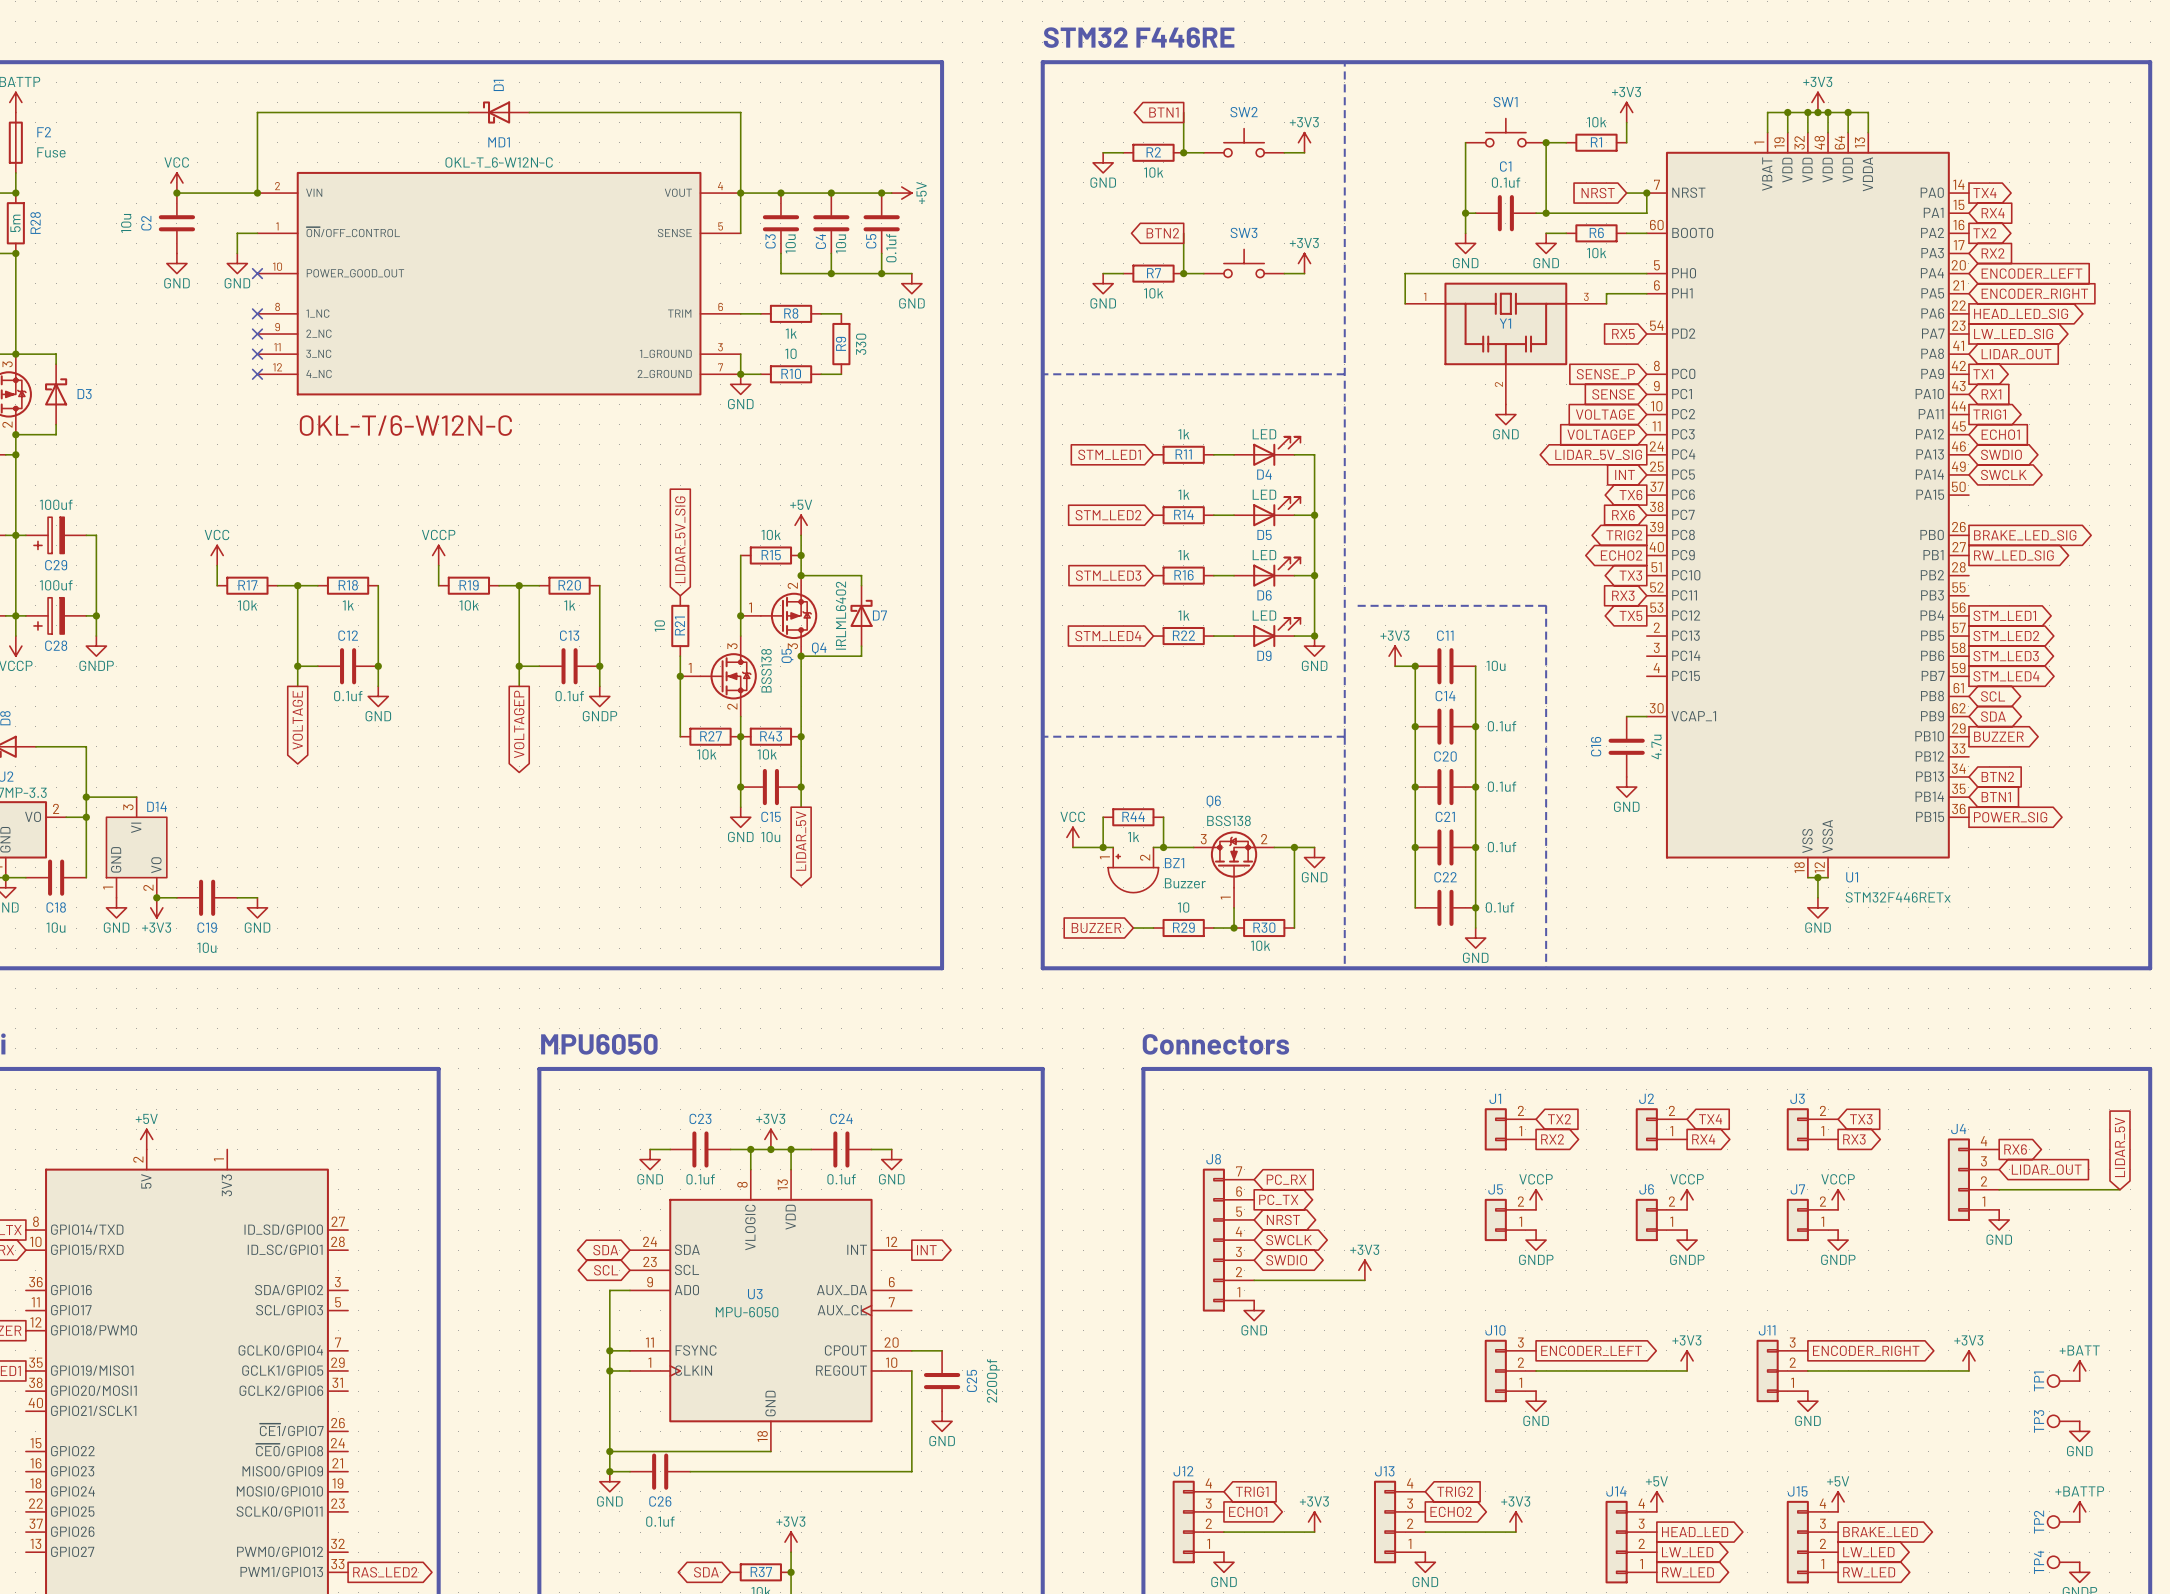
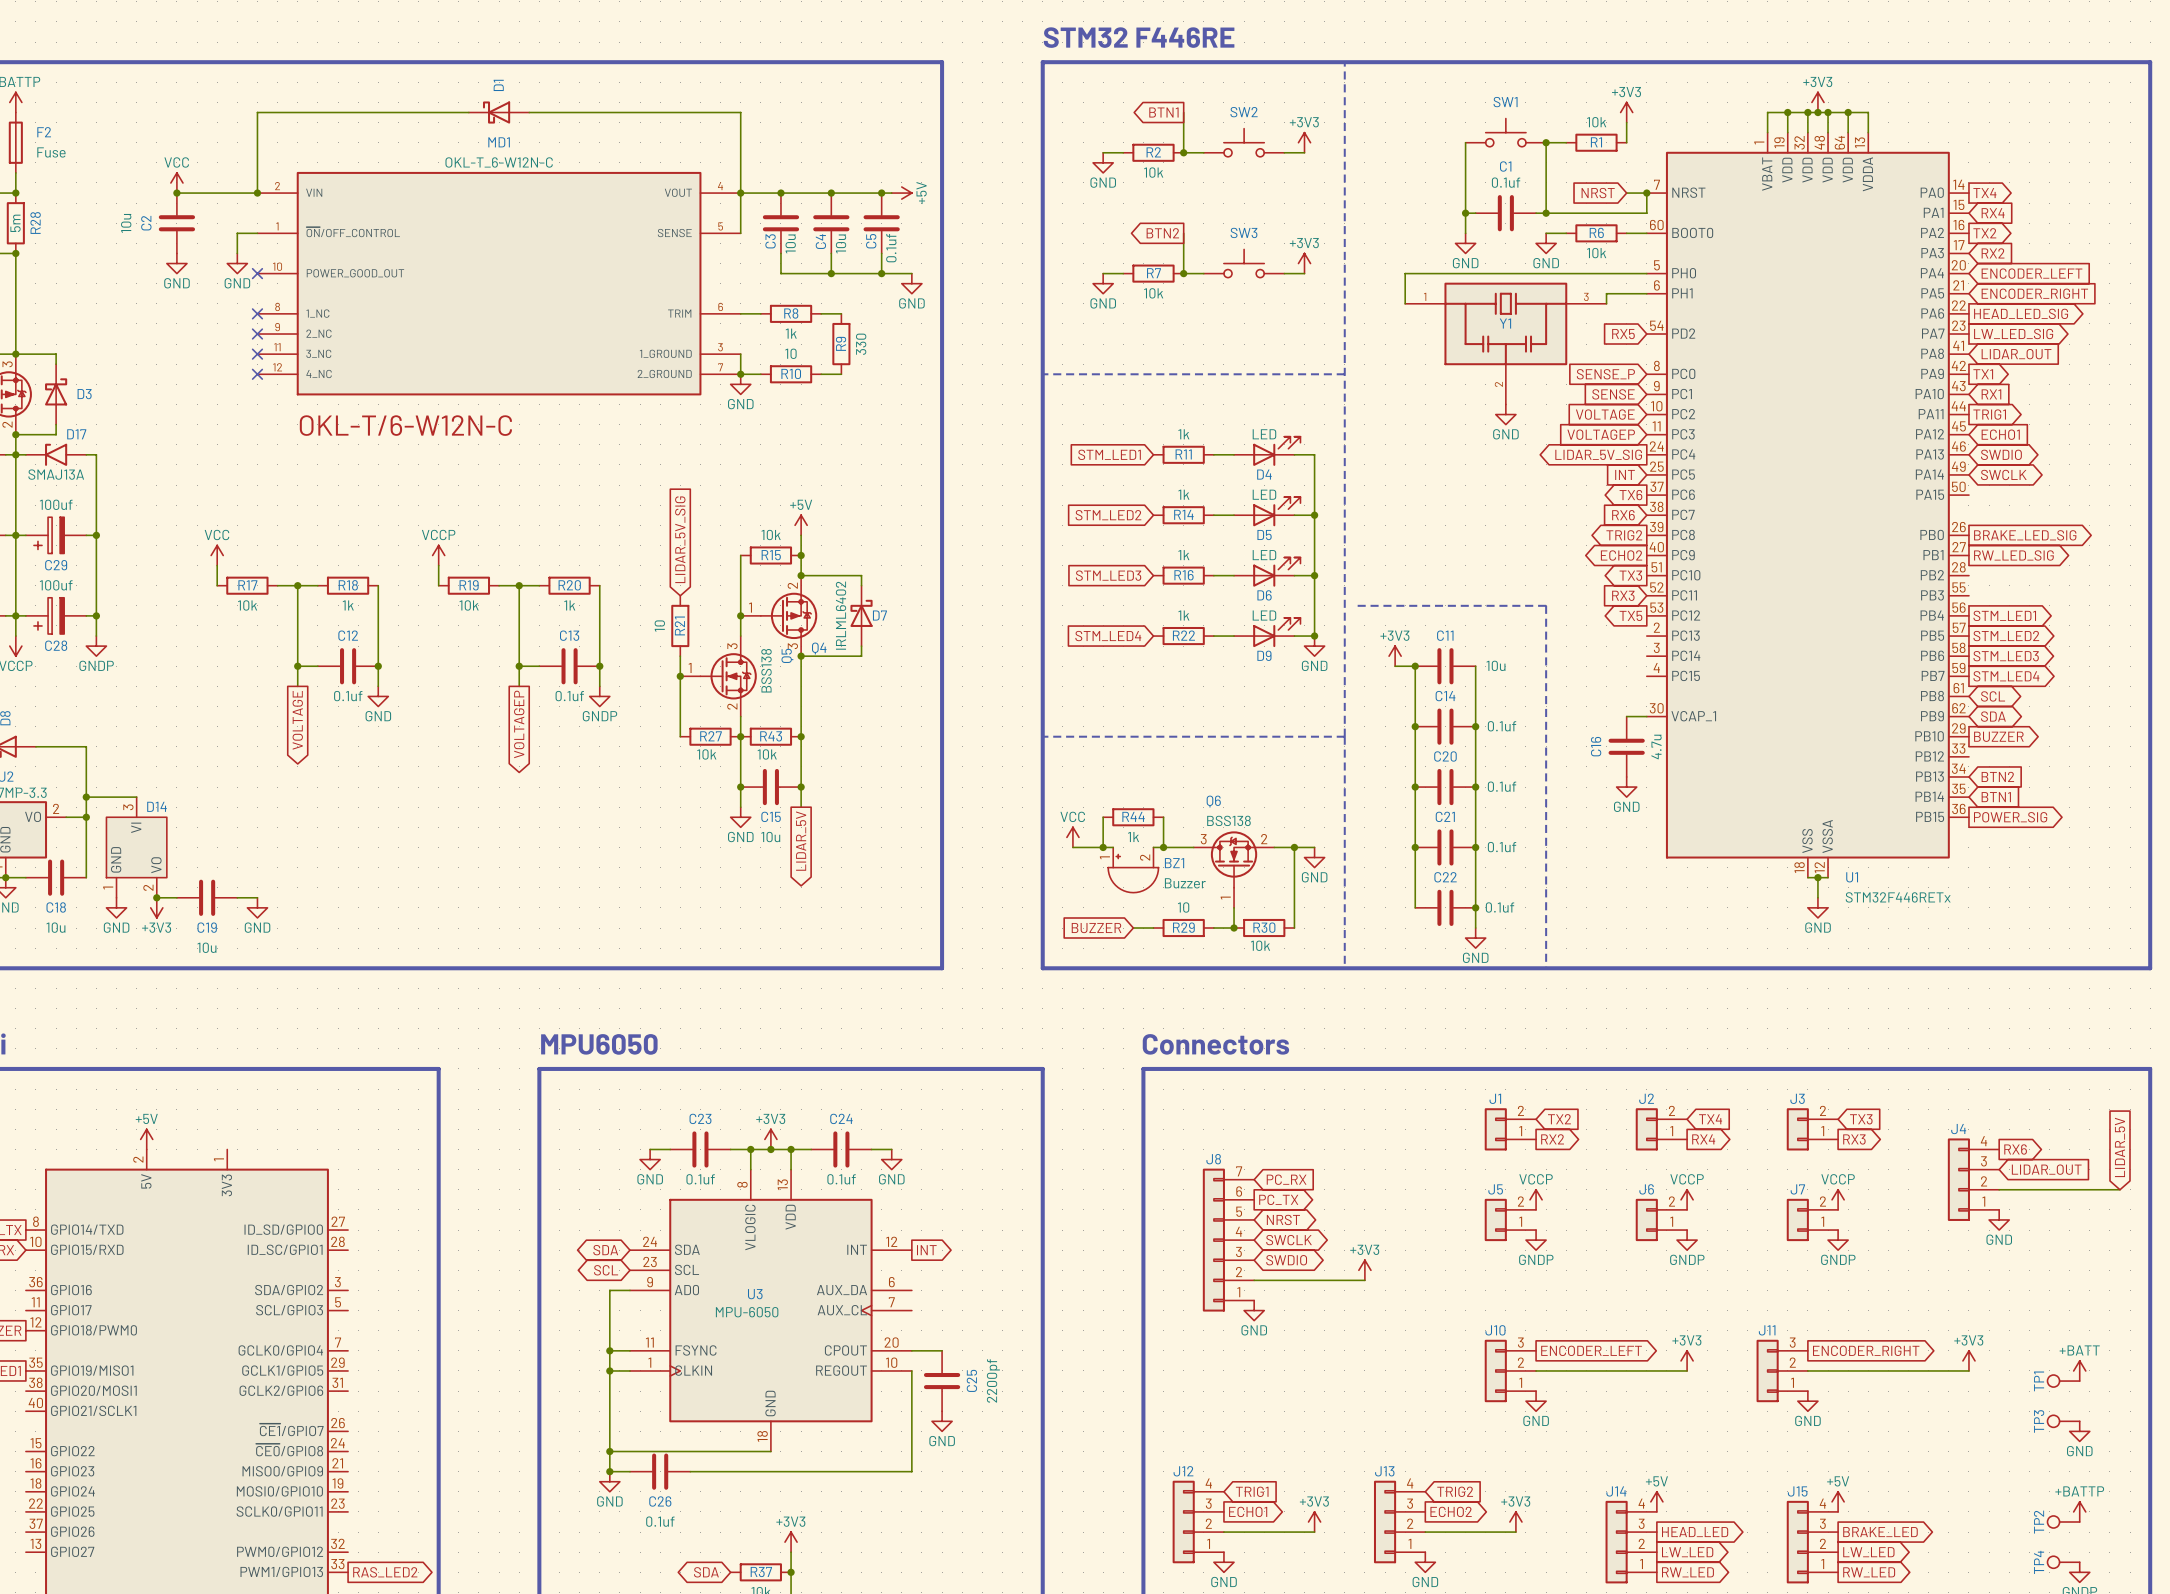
wire: none -> (15, 454) (25, 454)
D17: none -> SMAJ13A (56, 454)
wire: none -> (86, 454) (96, 454) (96, 535)
junction: none -> (96, 535)

